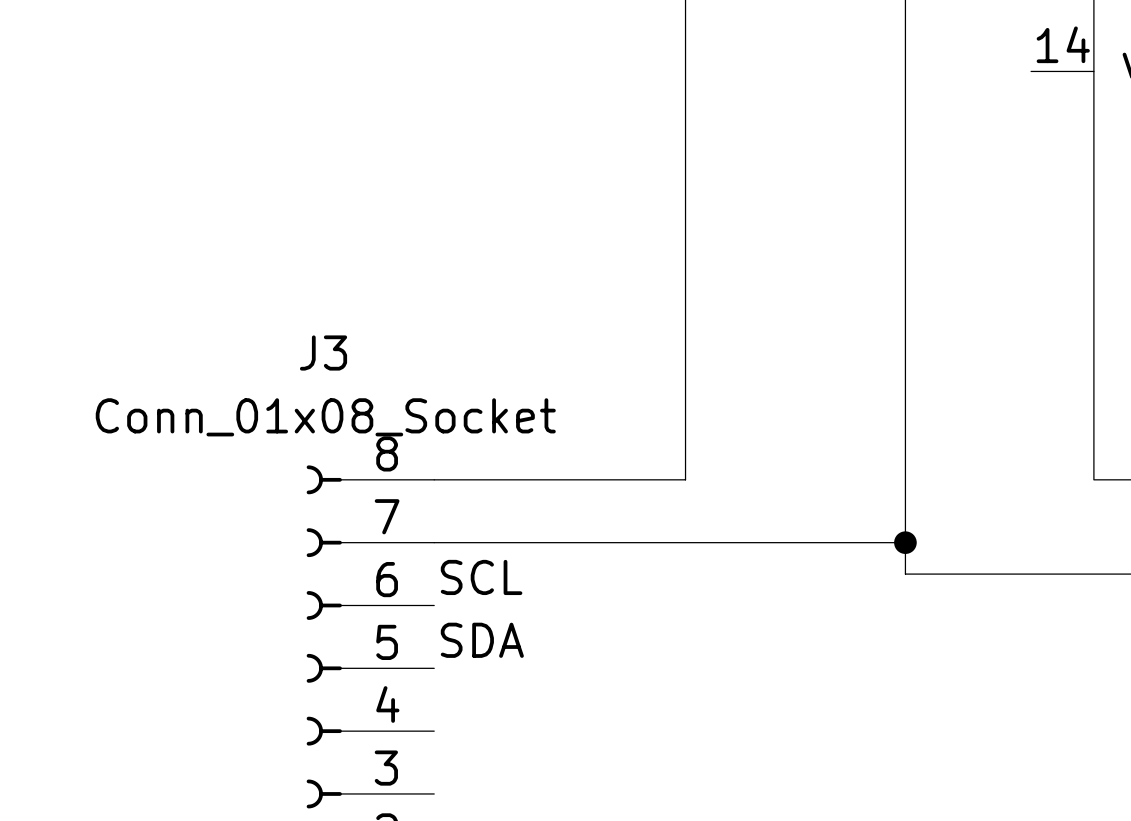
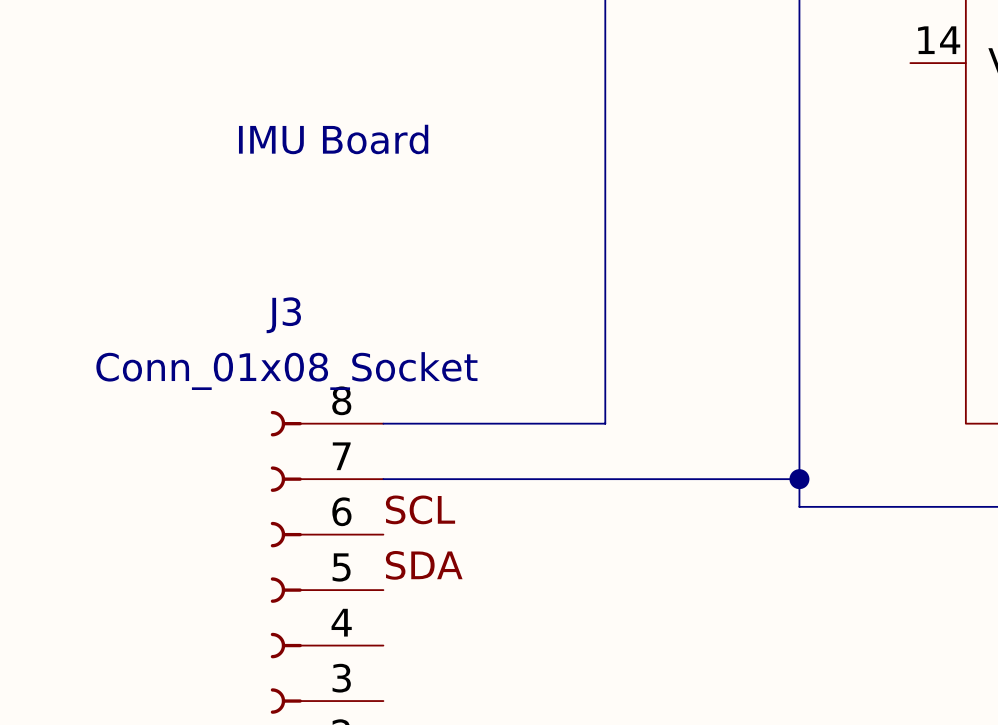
text: none -> IMU Board (333, 139)

